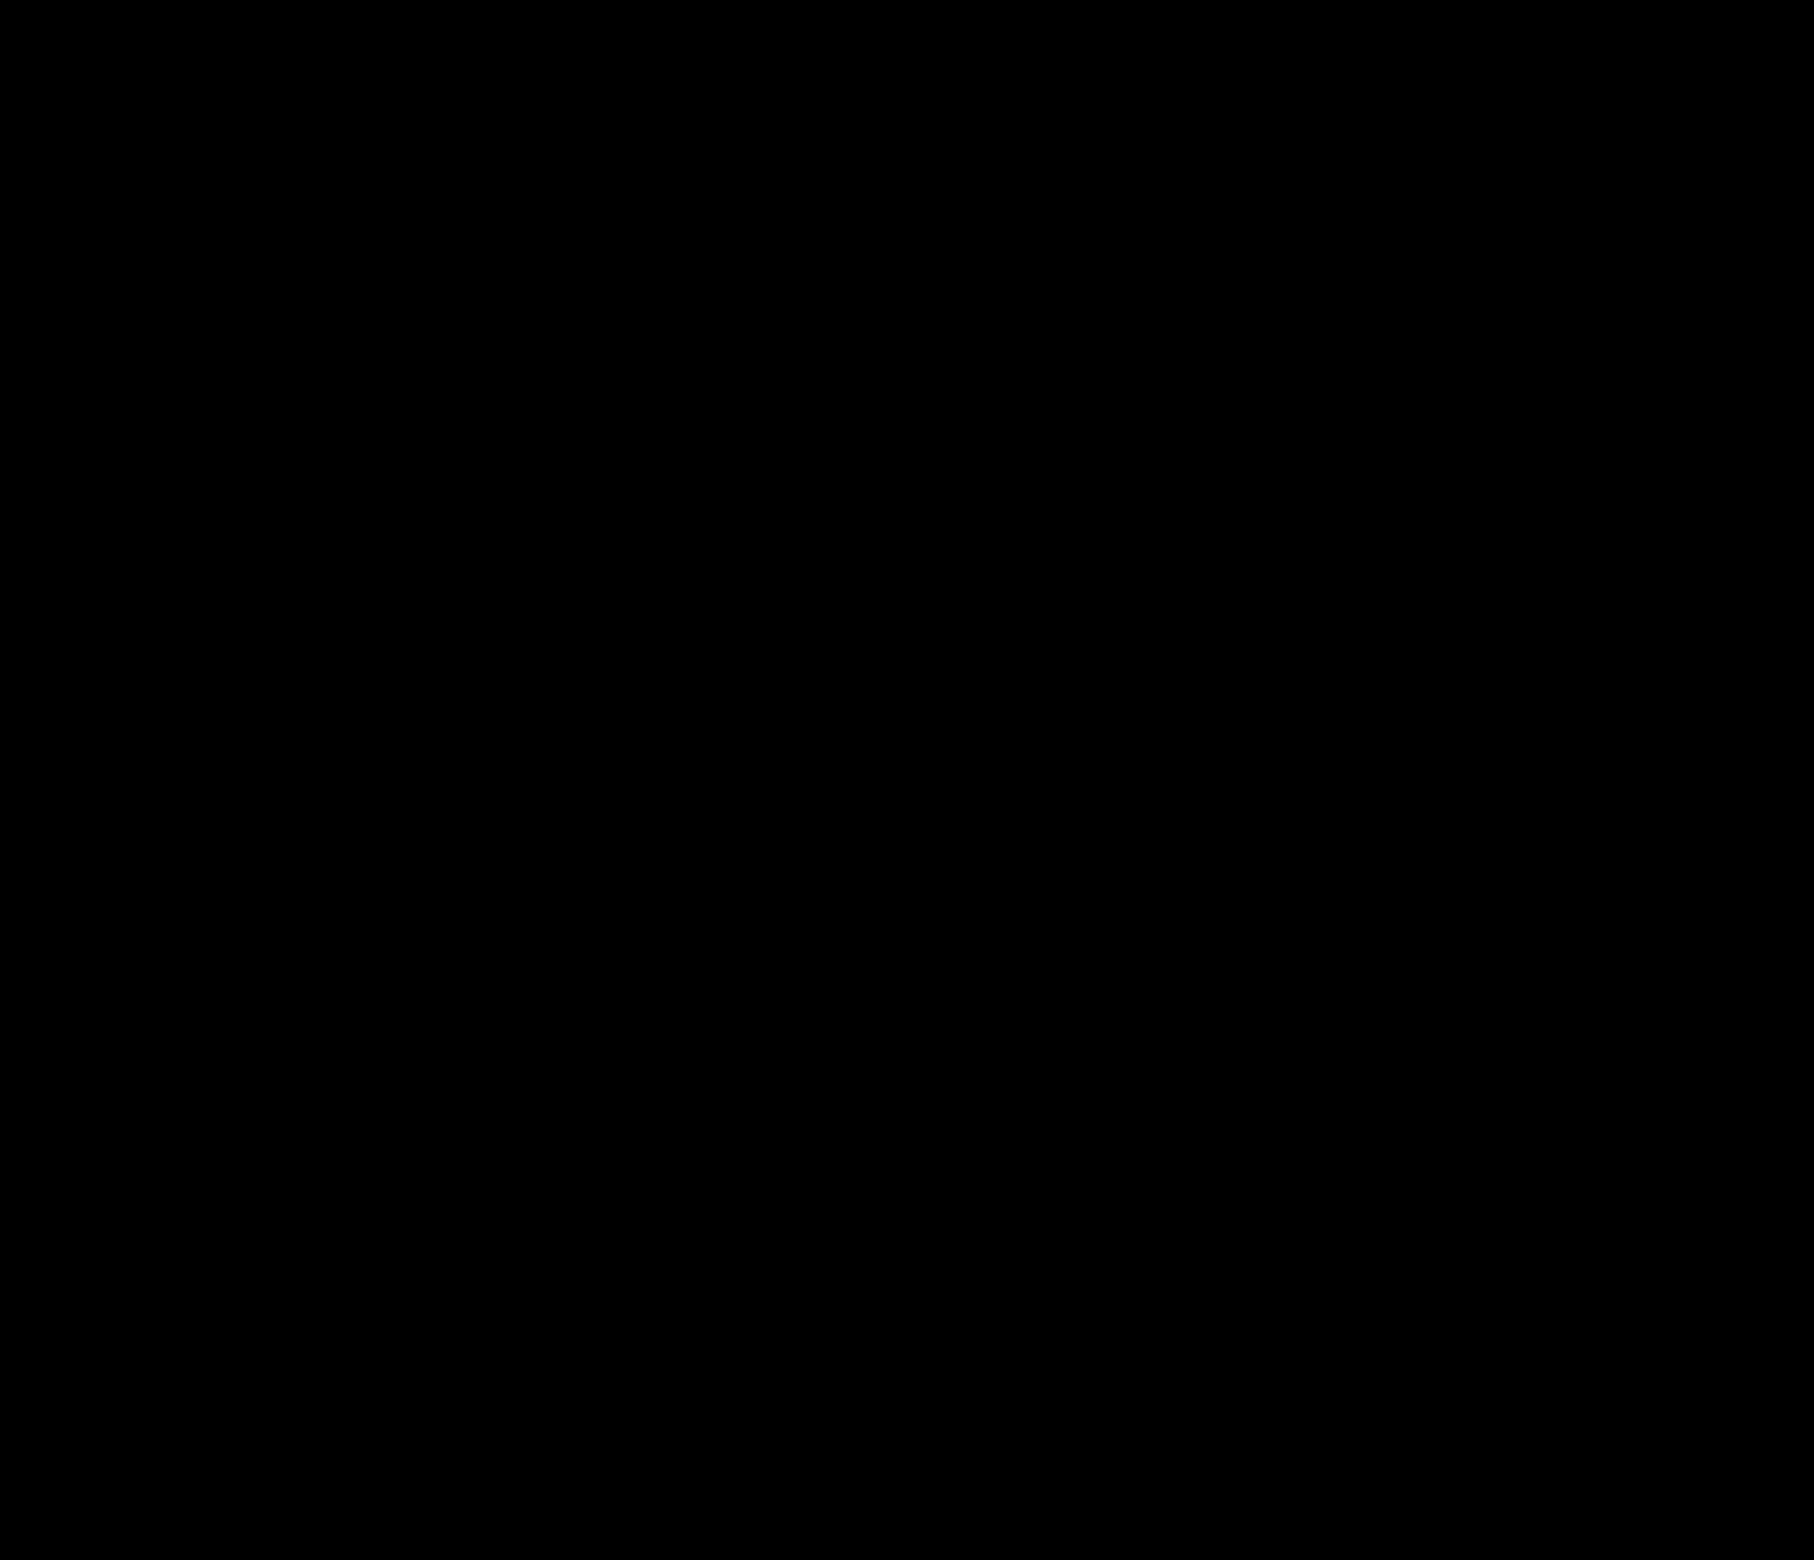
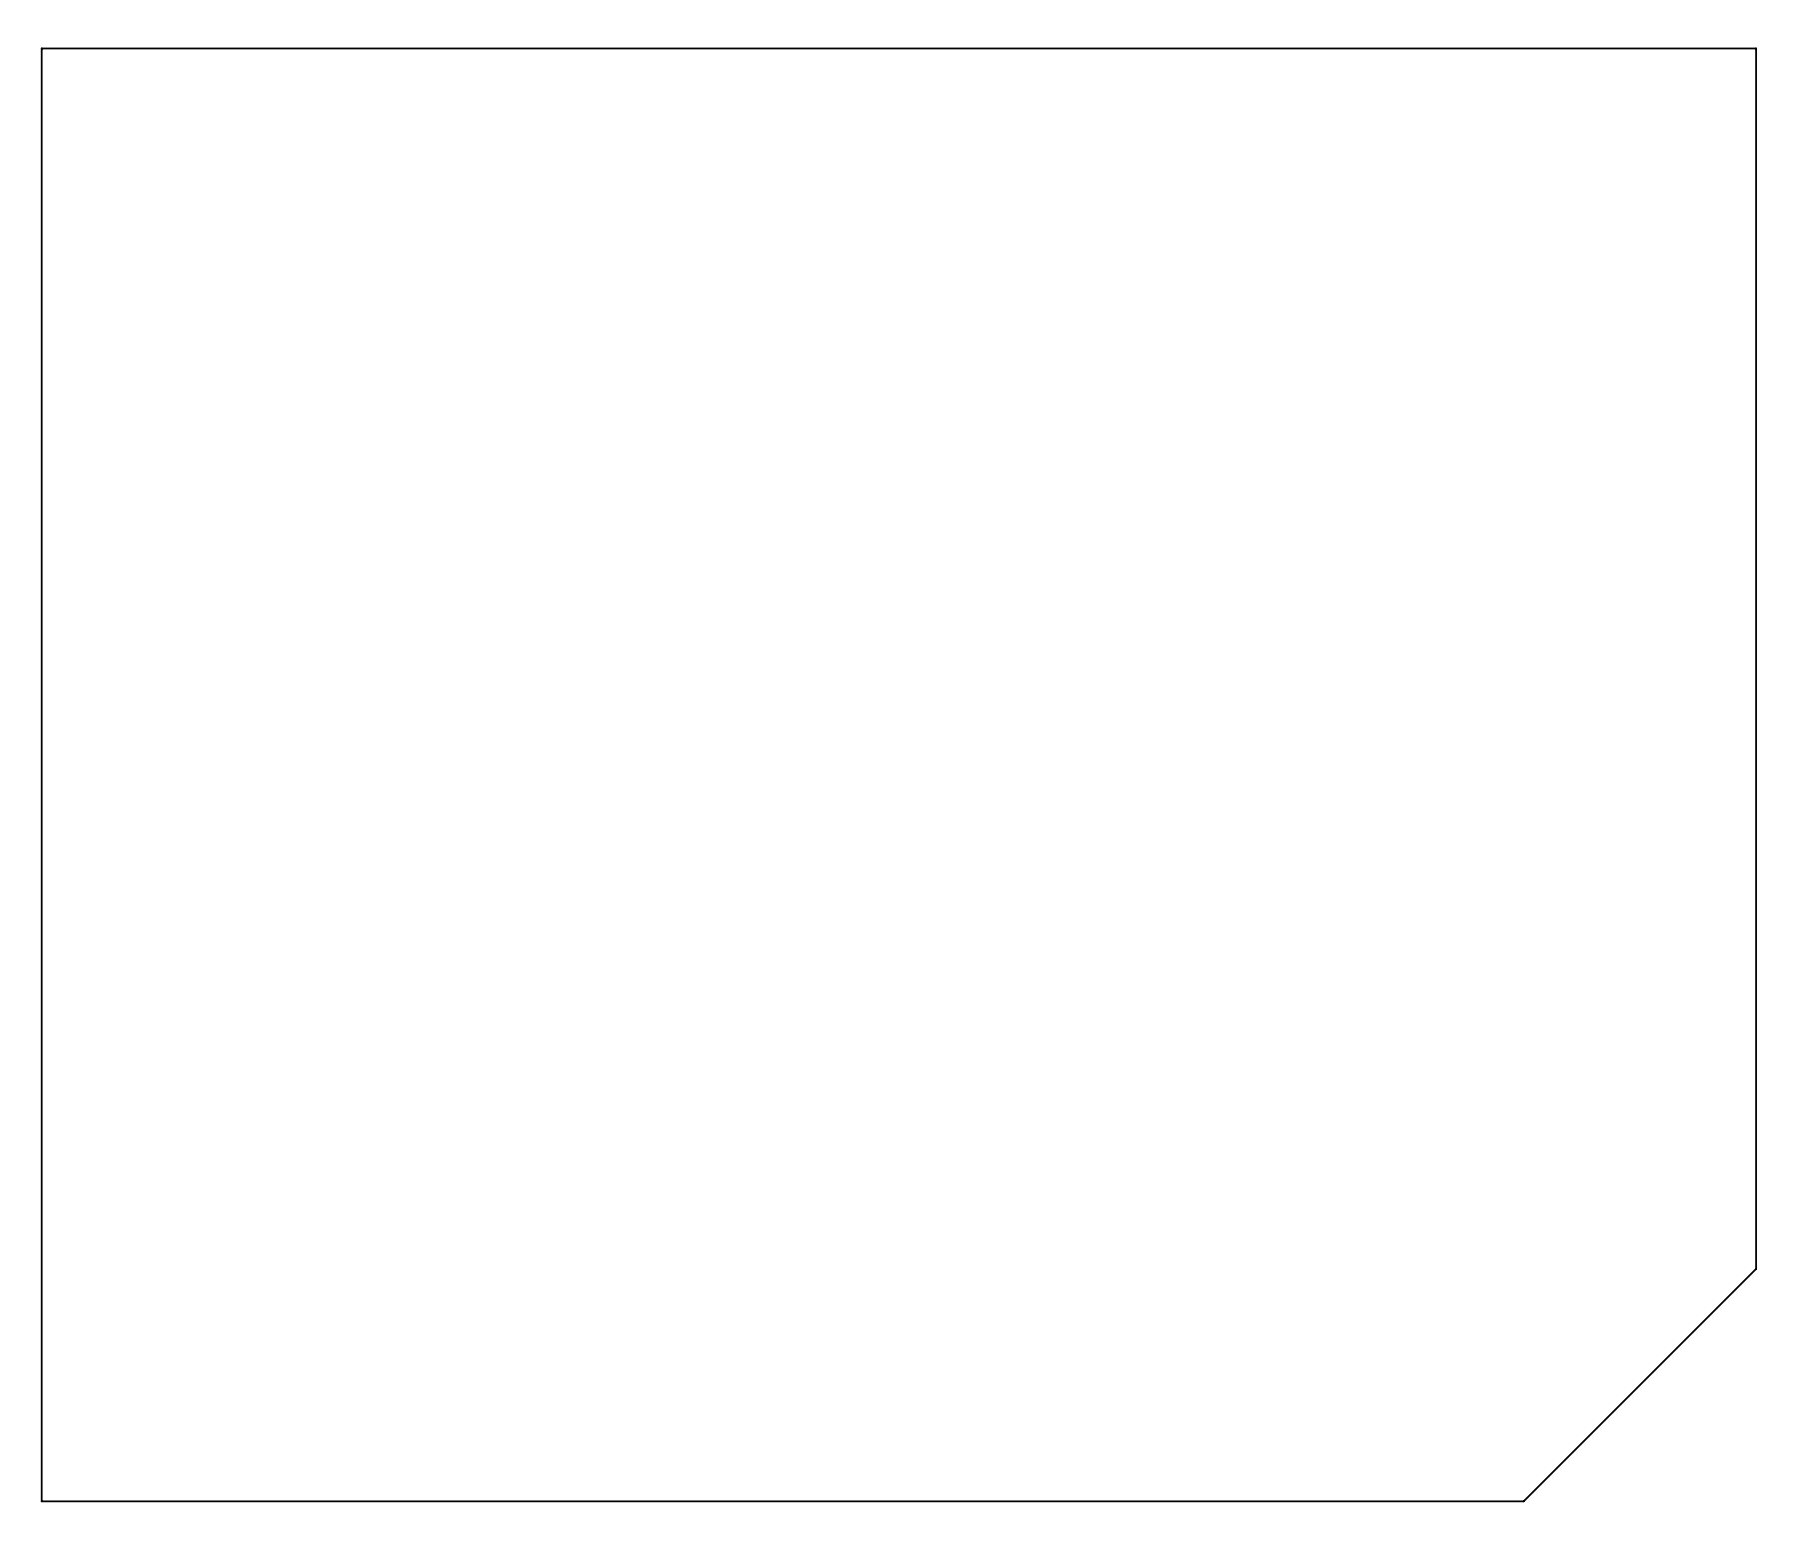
board edge: none -> (41, 48) (1756, 48) (1756, 1268) (1523, 1501) (41, 1501) (41, 48)

